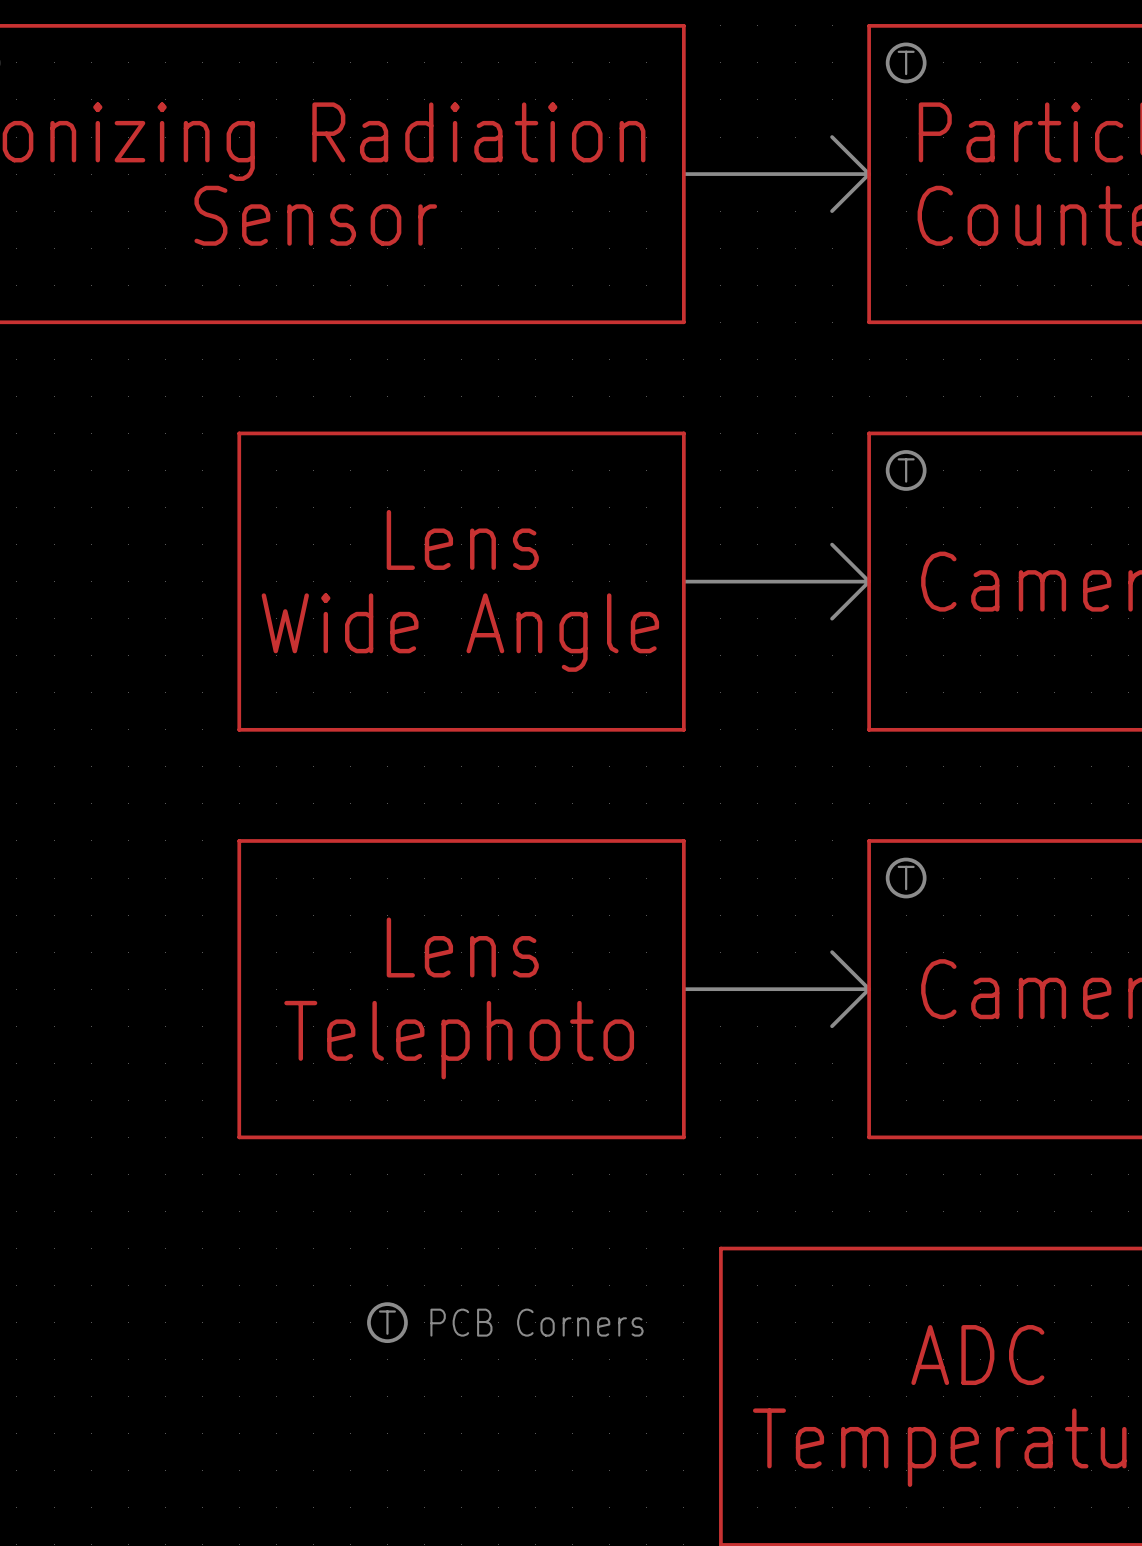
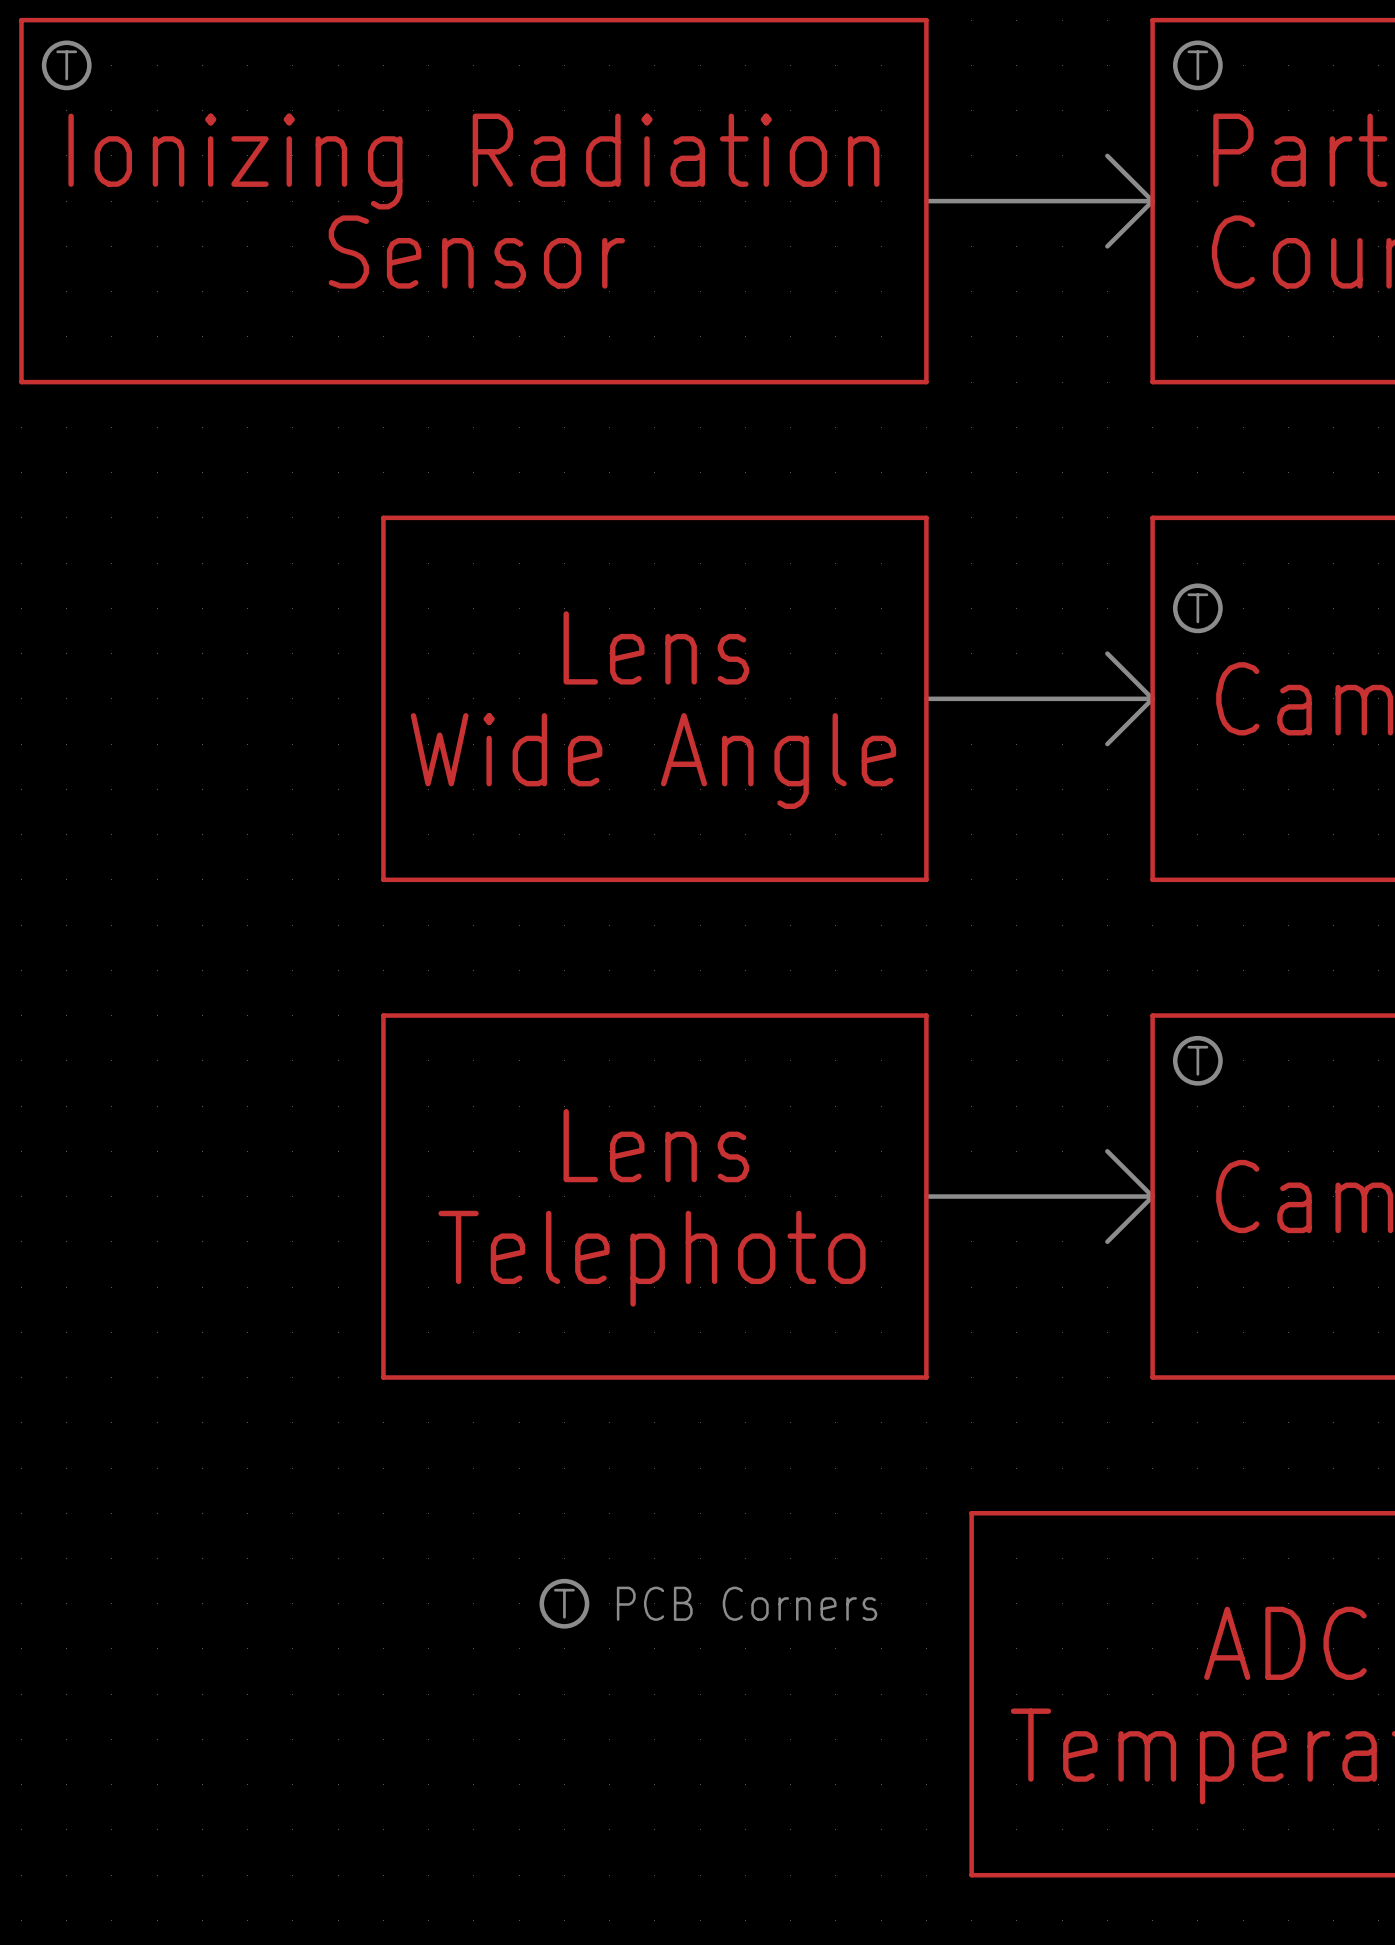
part position: (906, 470) -> (1197, 608)

